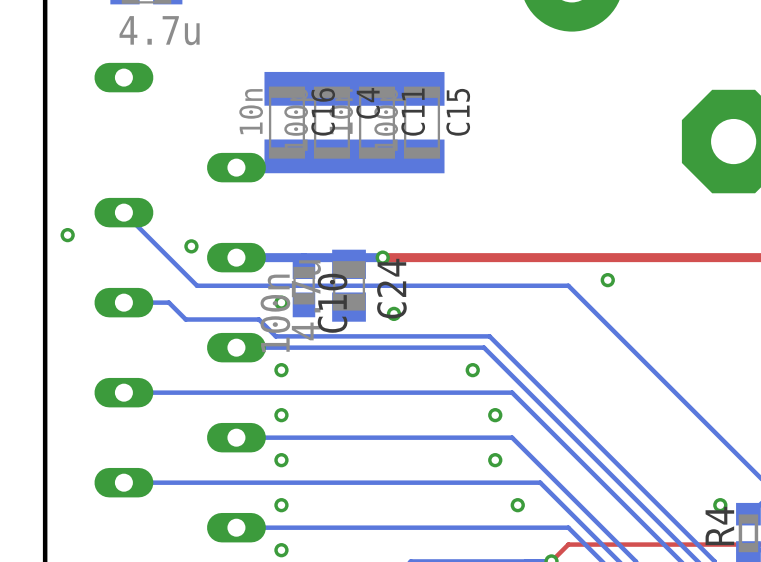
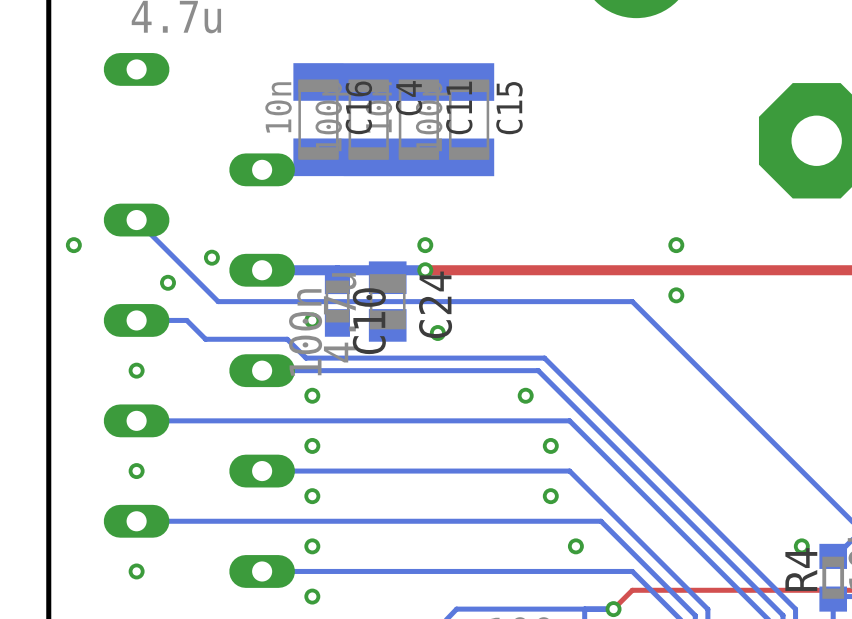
via: none -> (425, 245)
via: none -> (676, 245)
via: none -> (167, 282)
via: none -> (136, 370)
via: none -> (136, 471)
via: none -> (136, 571)

